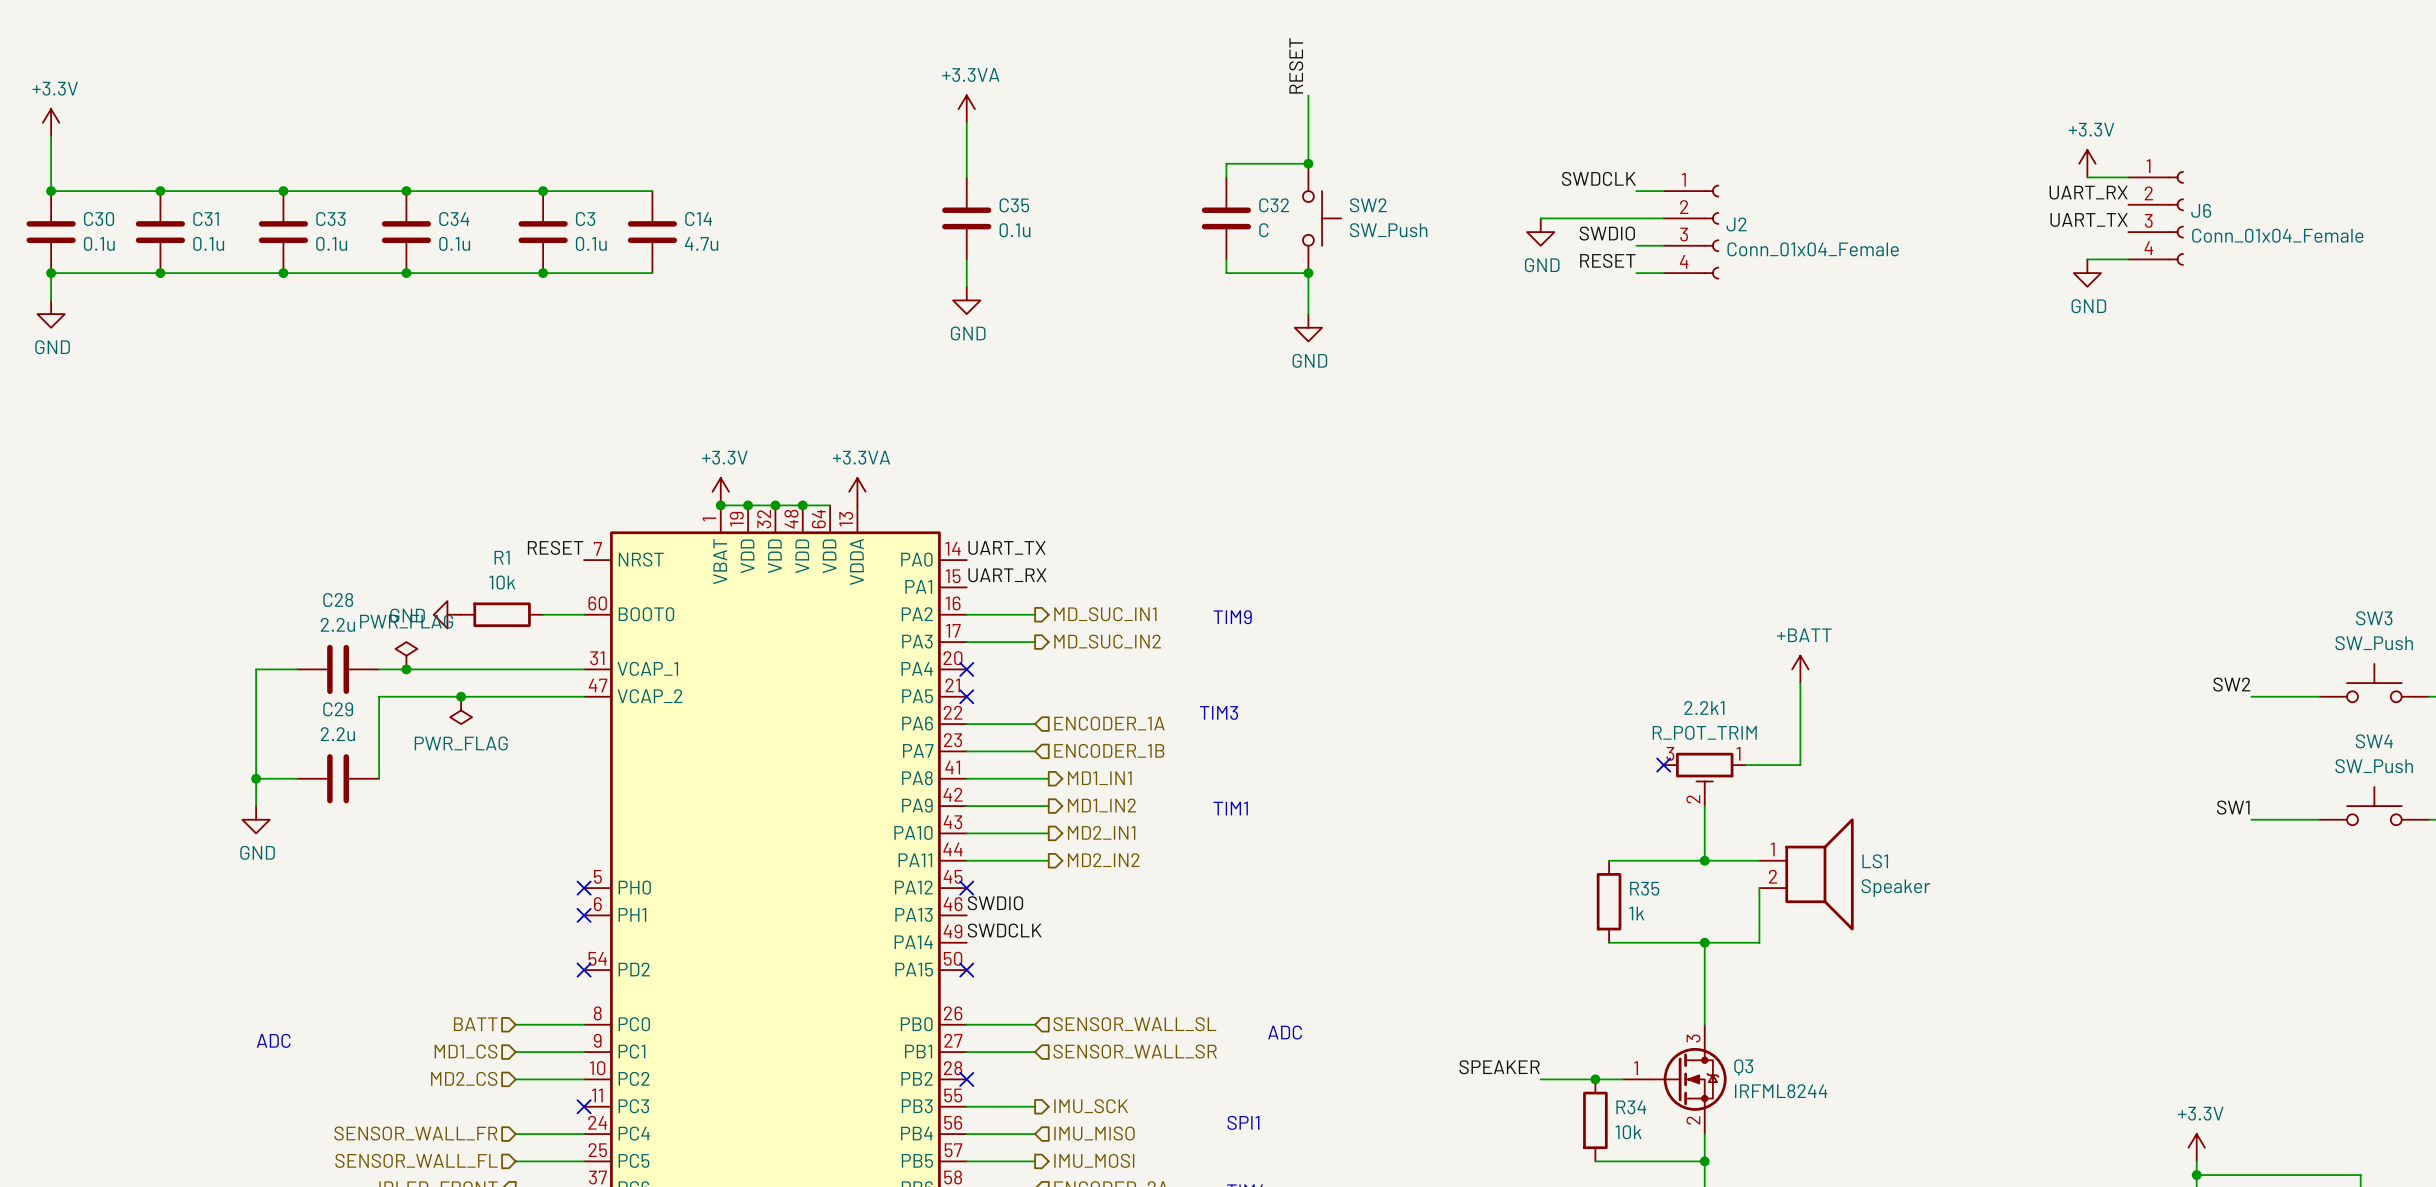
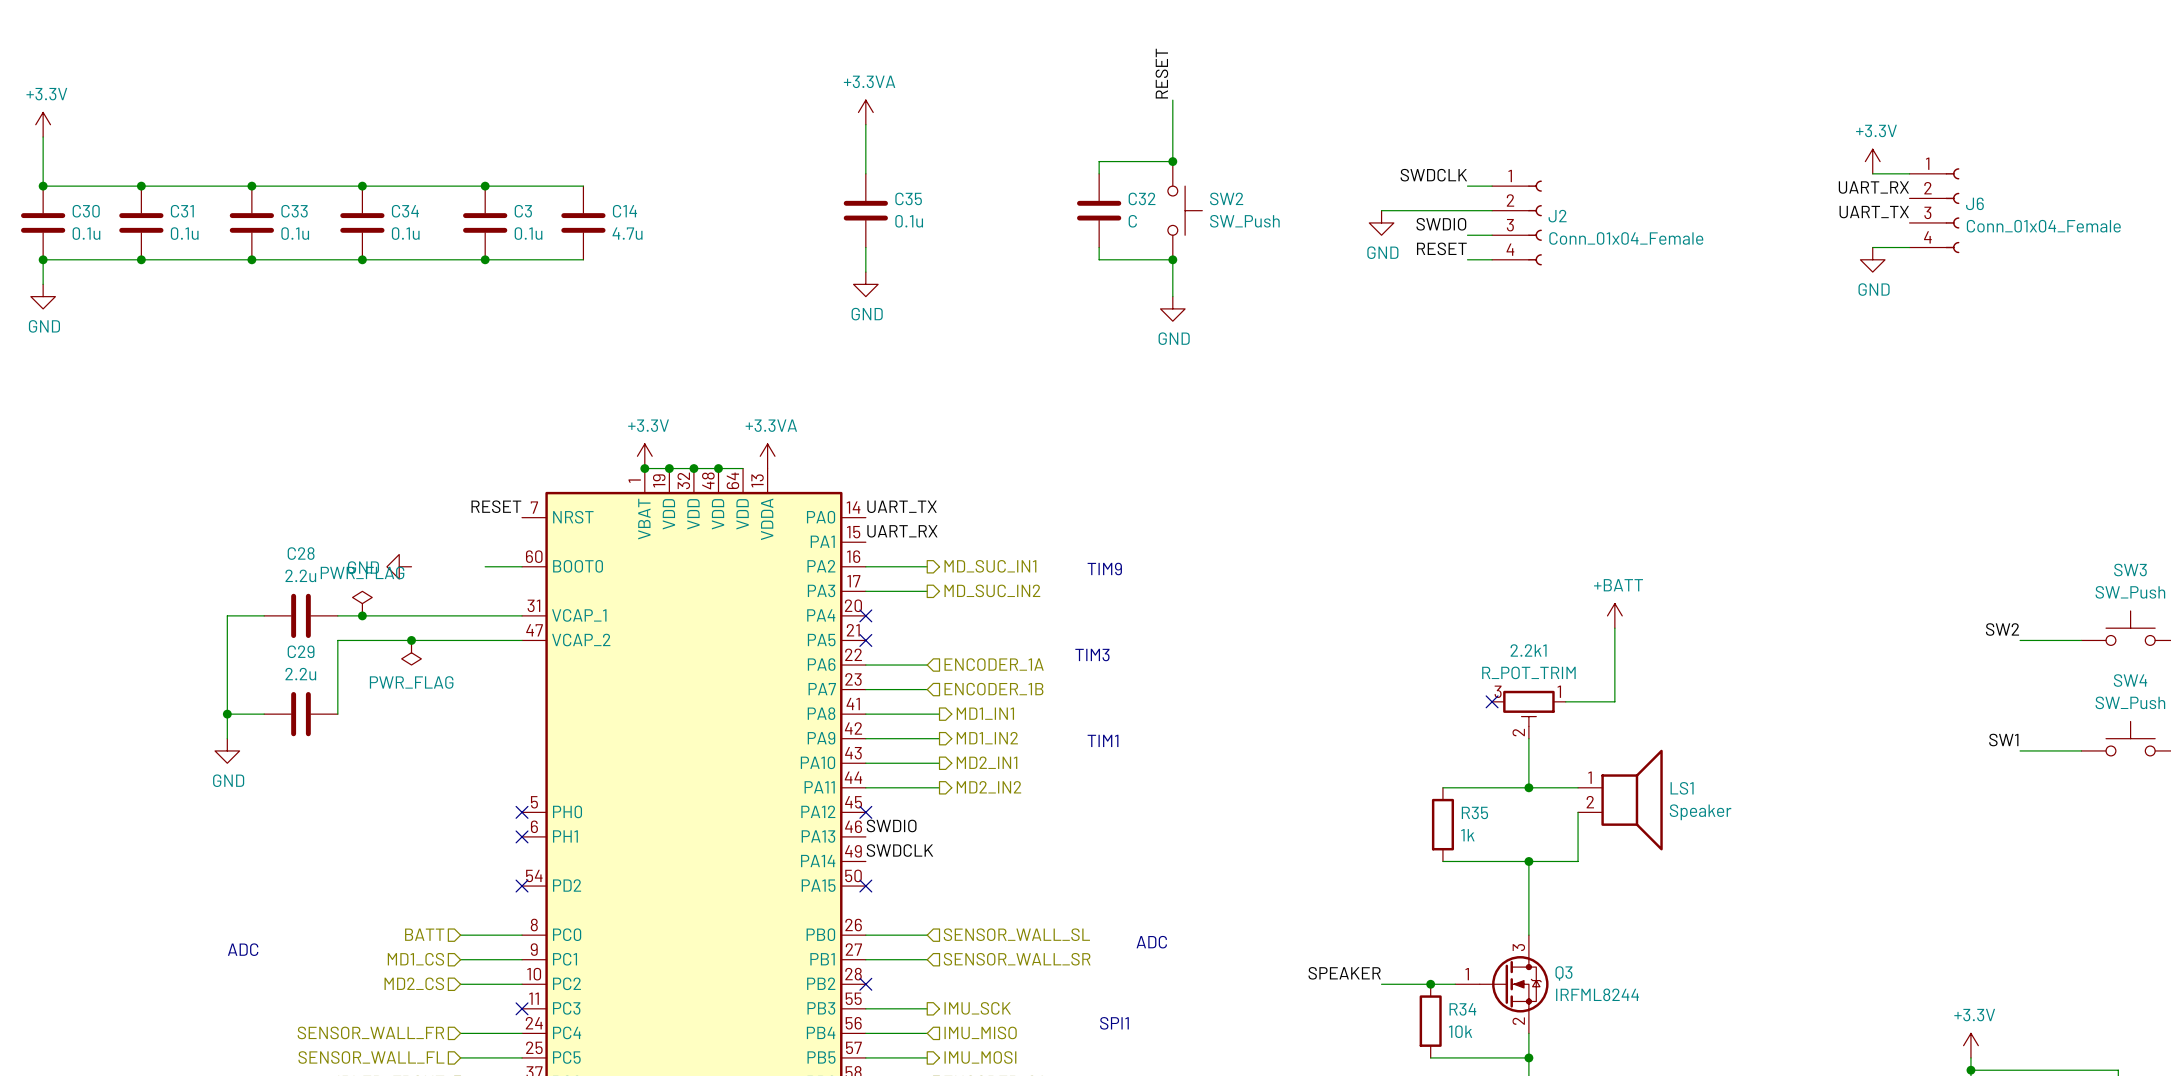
R1: 10k (502, 614) -> none

